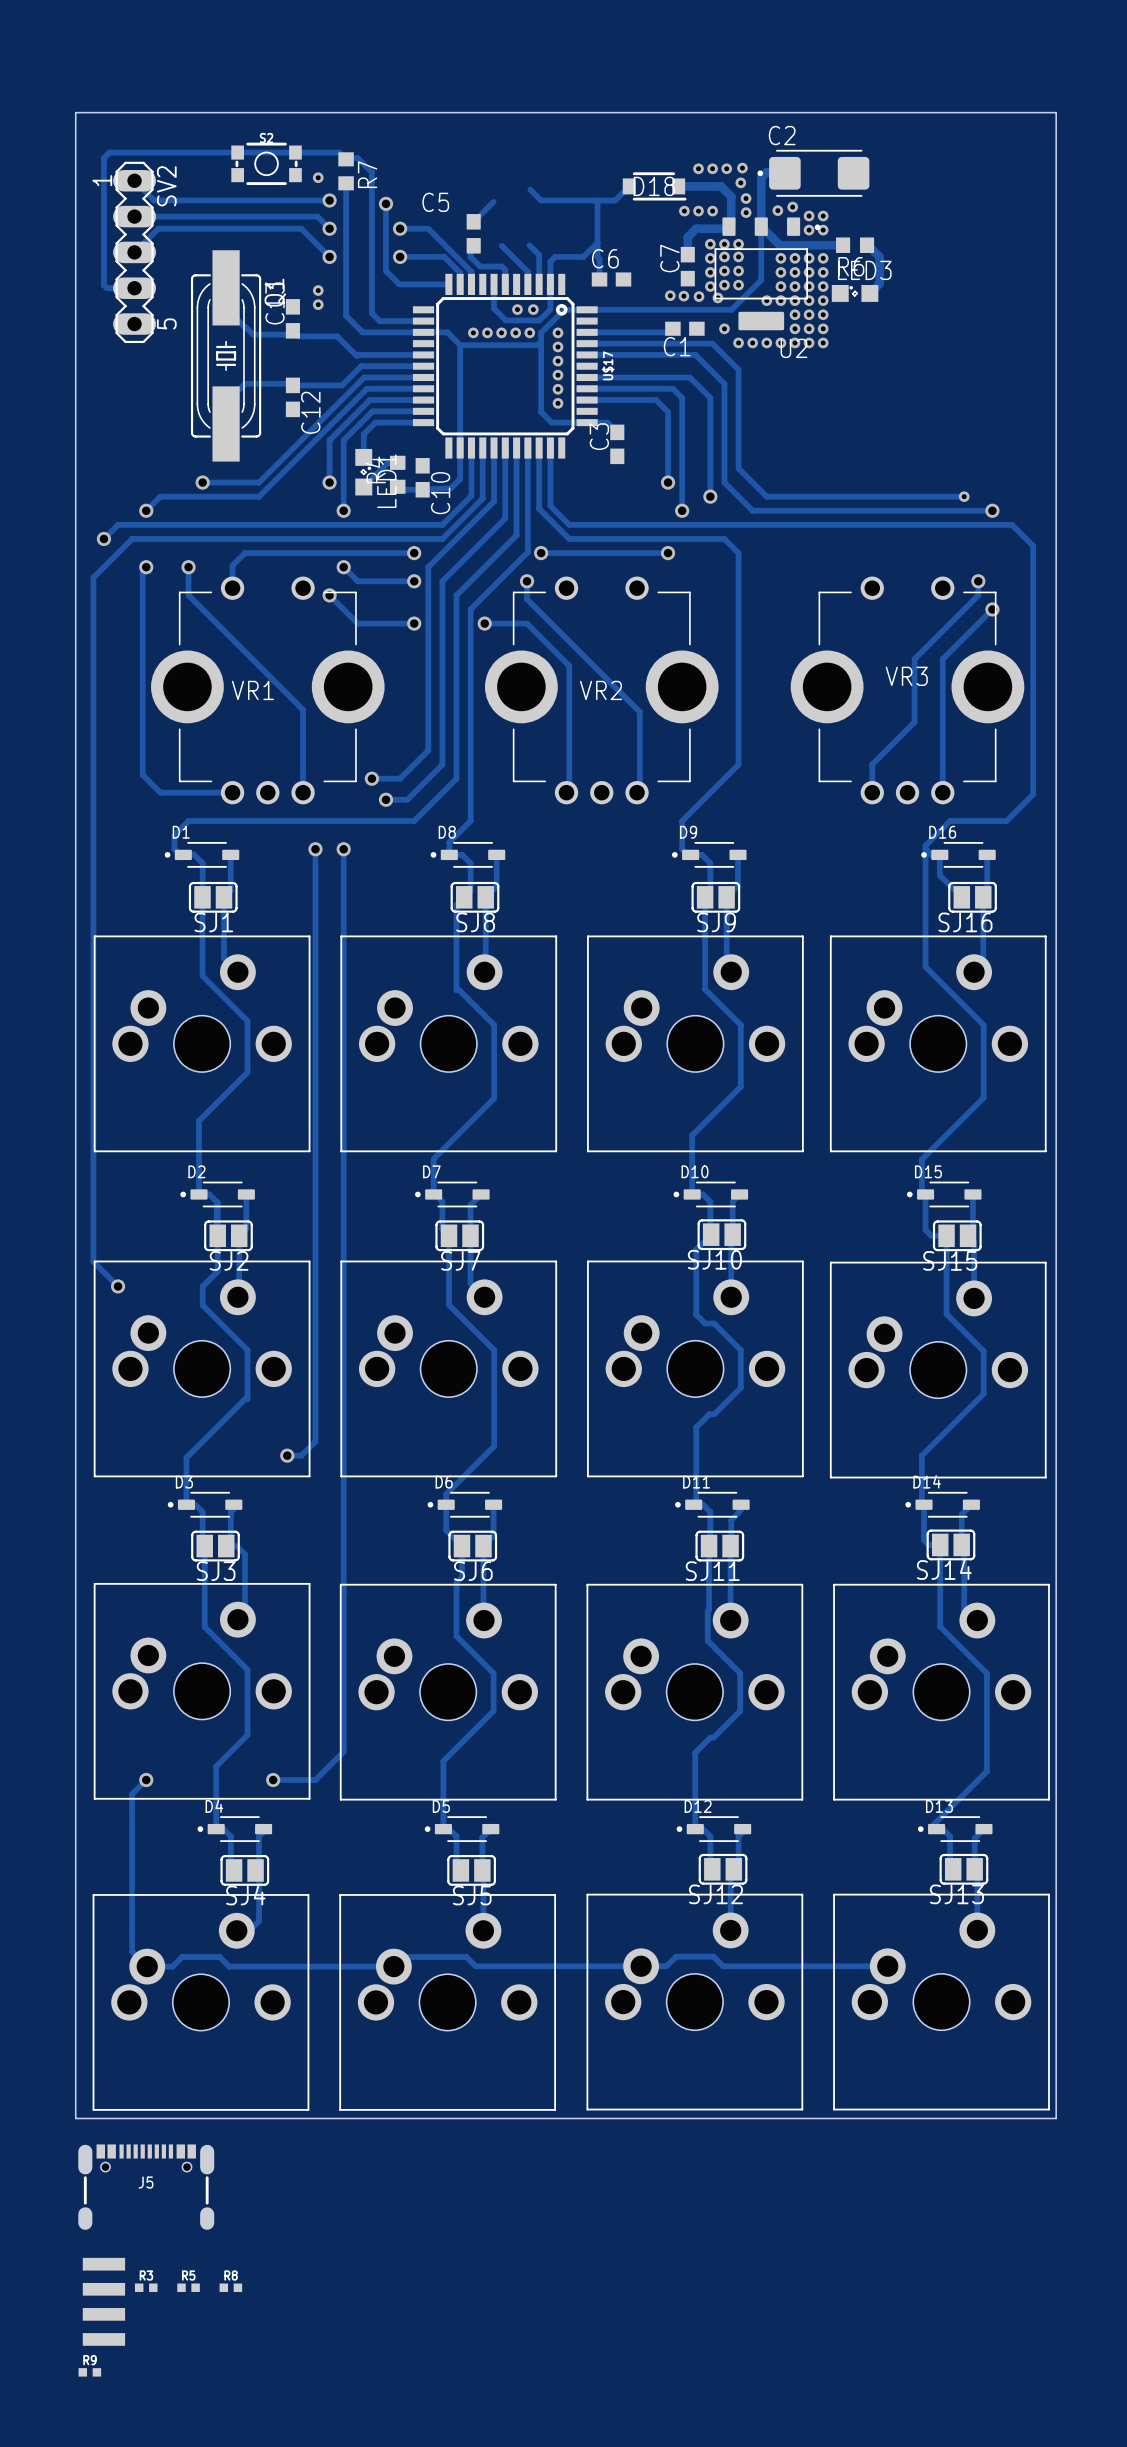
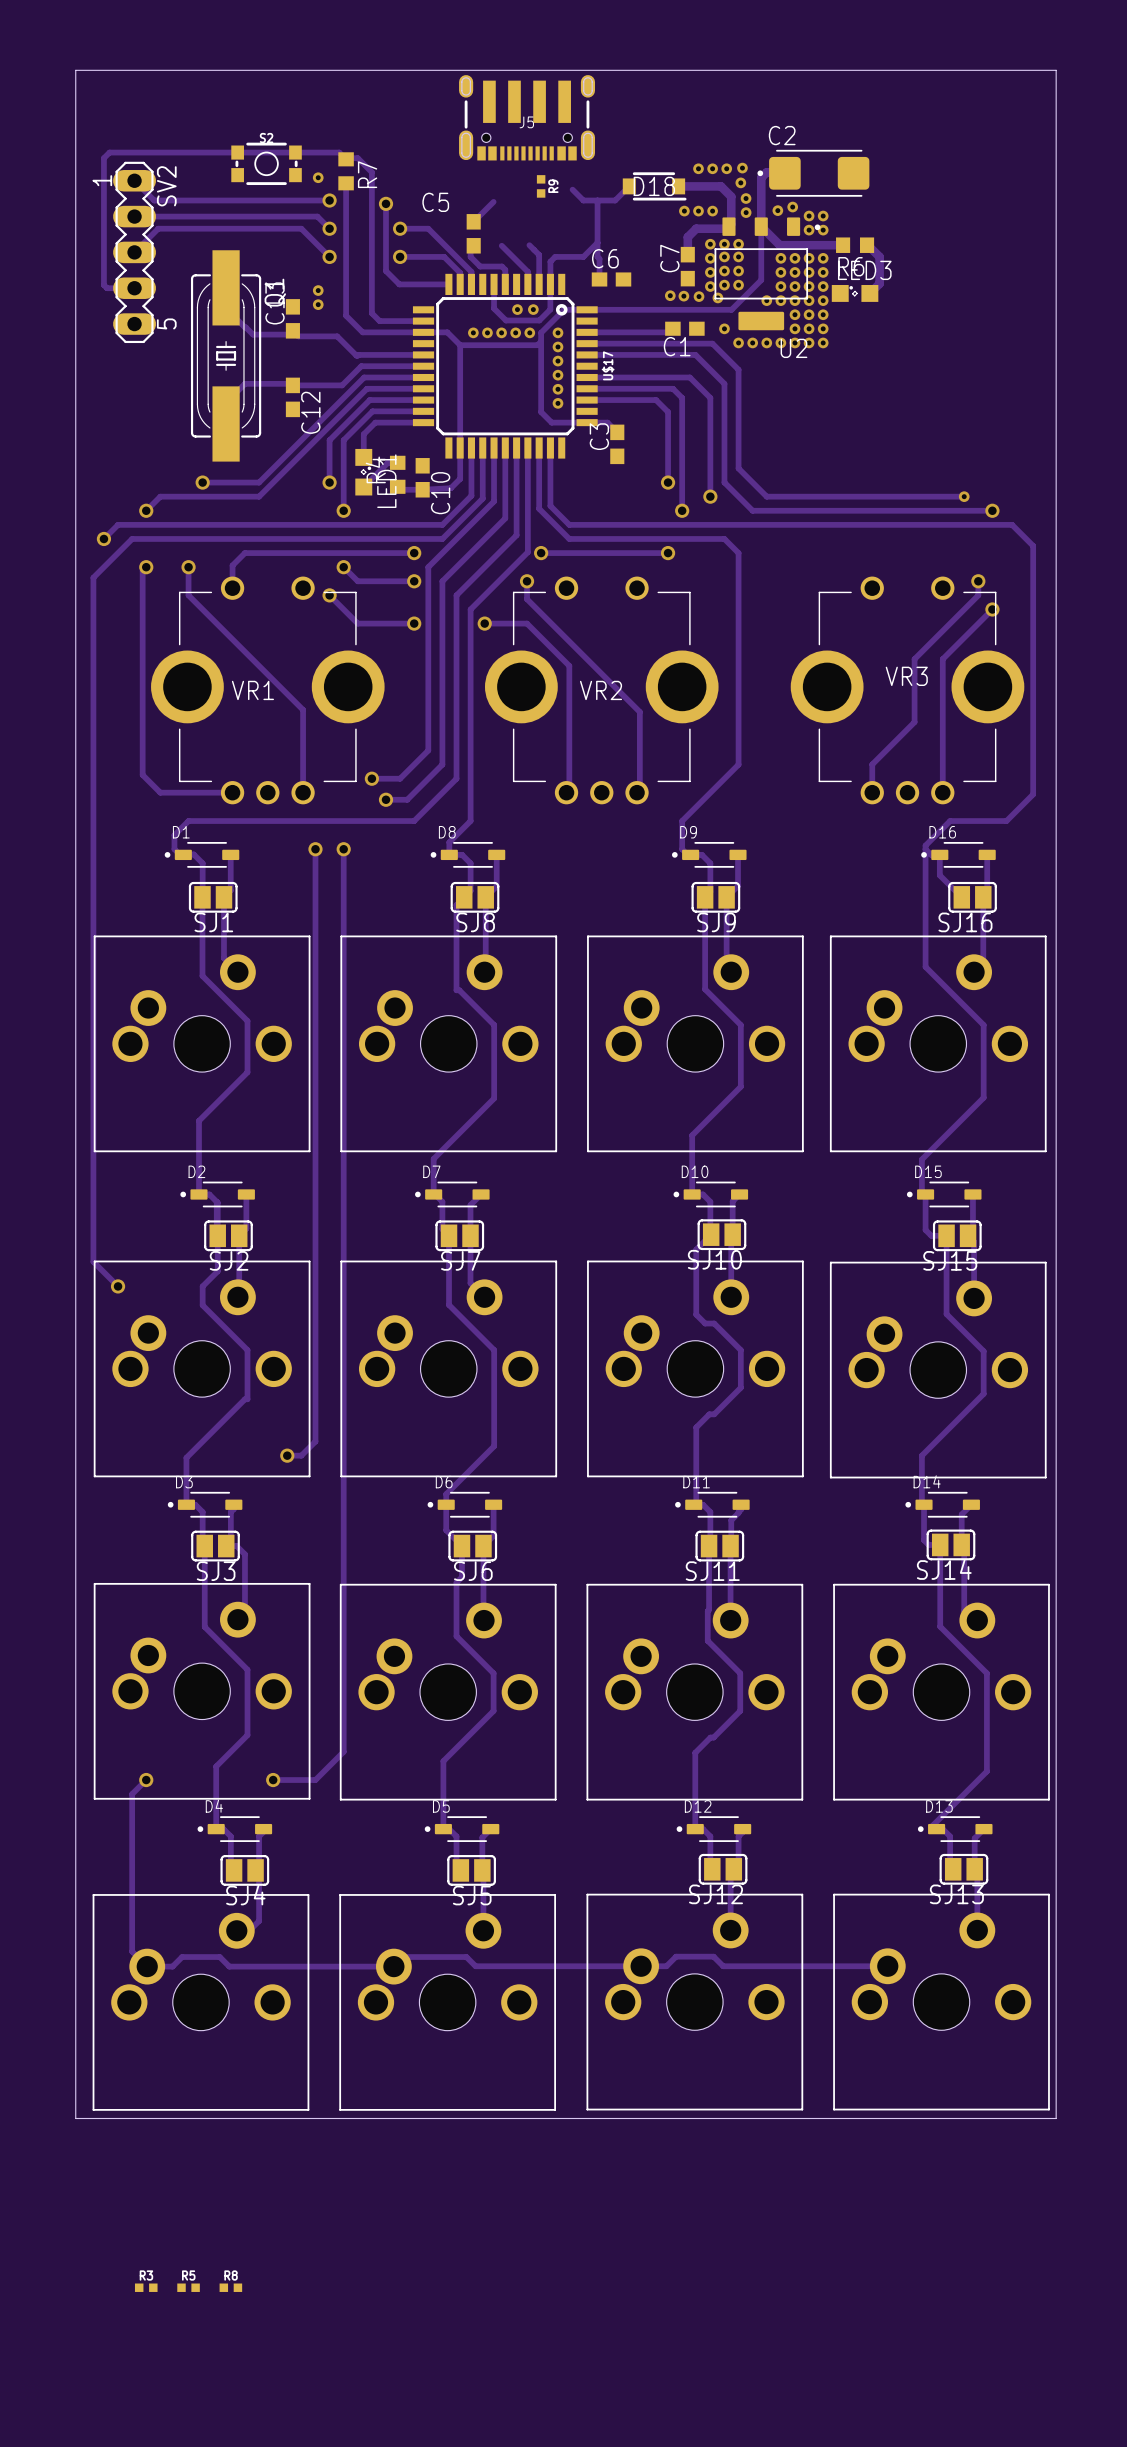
part: none -> (527, 101)
board edge: (75, 112) (1056, 112) -> (75, 112) (75, 70) (1056, 70) (1056, 112)
track: (530, 189) (541, 200) (583, 200) -> (572, 189) (583, 200)
J5 rotation: 0° (146, 2187) -> 180° (527, 117)
J5 position: (146, 2187) -> (527, 117)
part: (103, 2301) -> none
R9 rotation: 0° (89, 2372) -> 90° clockwise (541, 186)
R9 position: (89, 2372) -> (541, 186)

